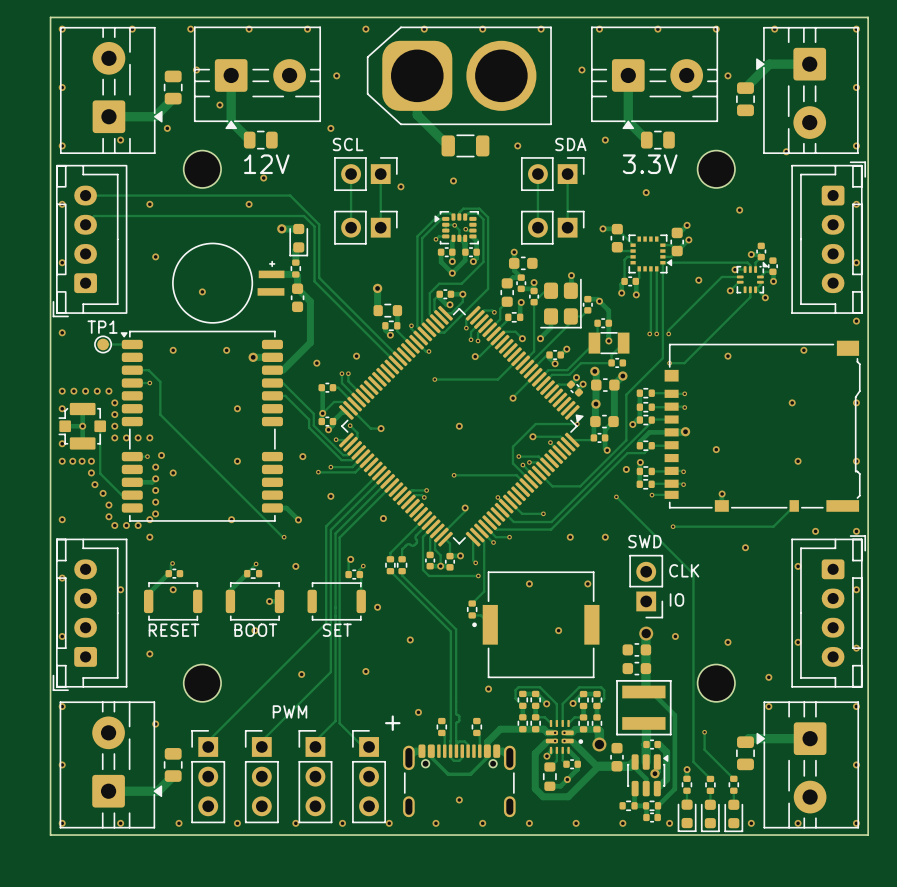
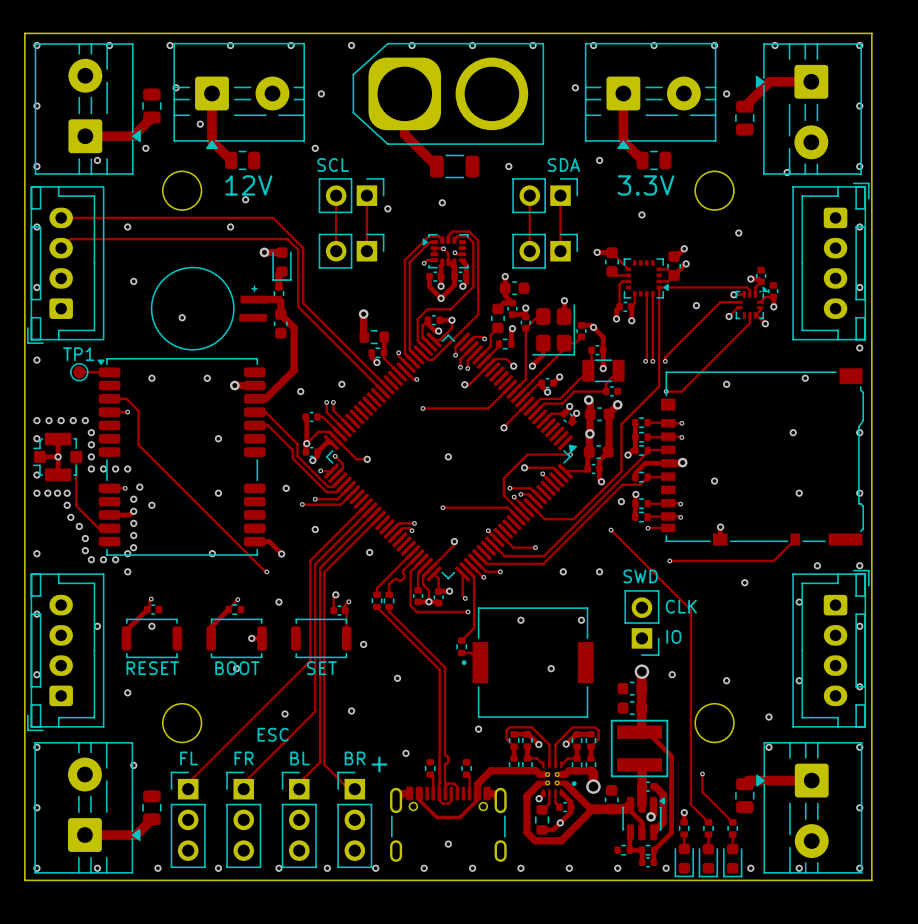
text: none -> ESC (273, 734)
text: PWM (289, 711) -> none
text: none -> FL (189, 758)
text: none -> FR (244, 758)
text: none -> BL (300, 758)
text: none -> BR (355, 758)

